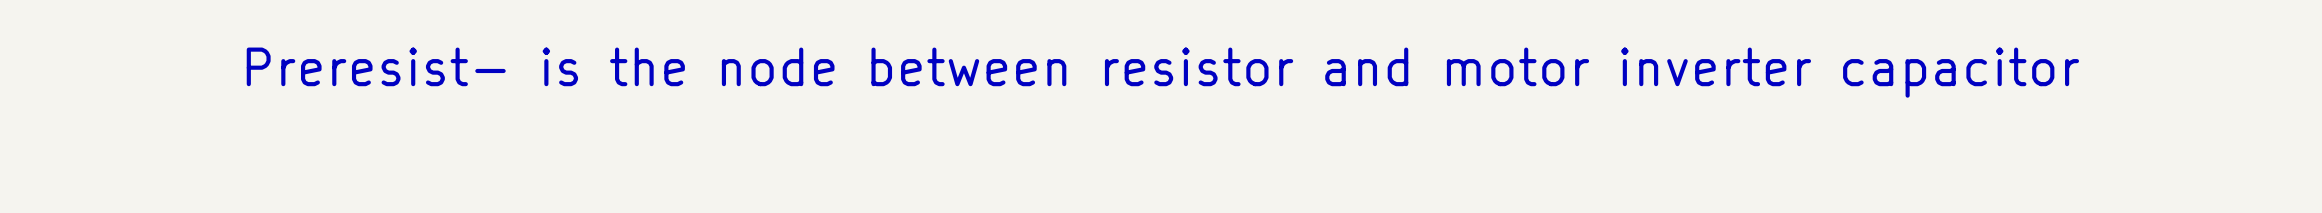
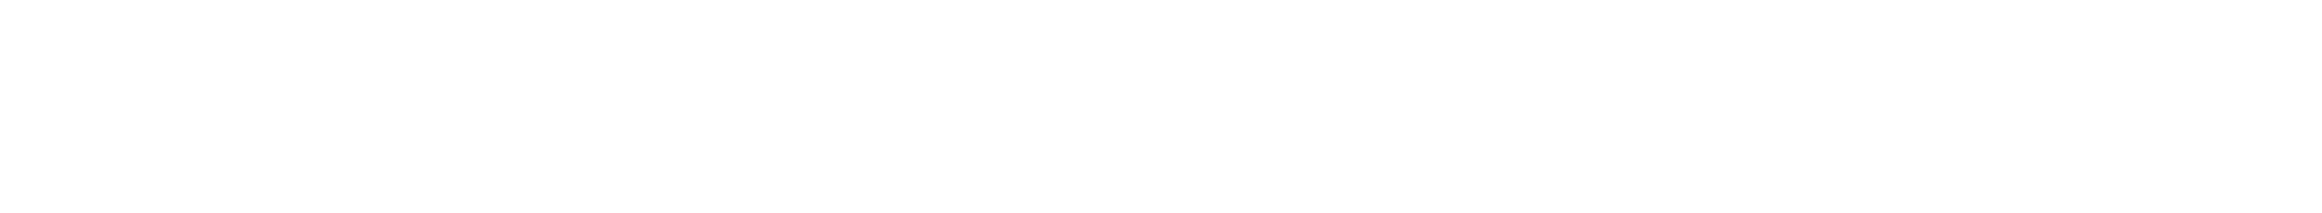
text: Preresist- is the node between resistor and motor inverter capacitor (1162, 72) -> none

